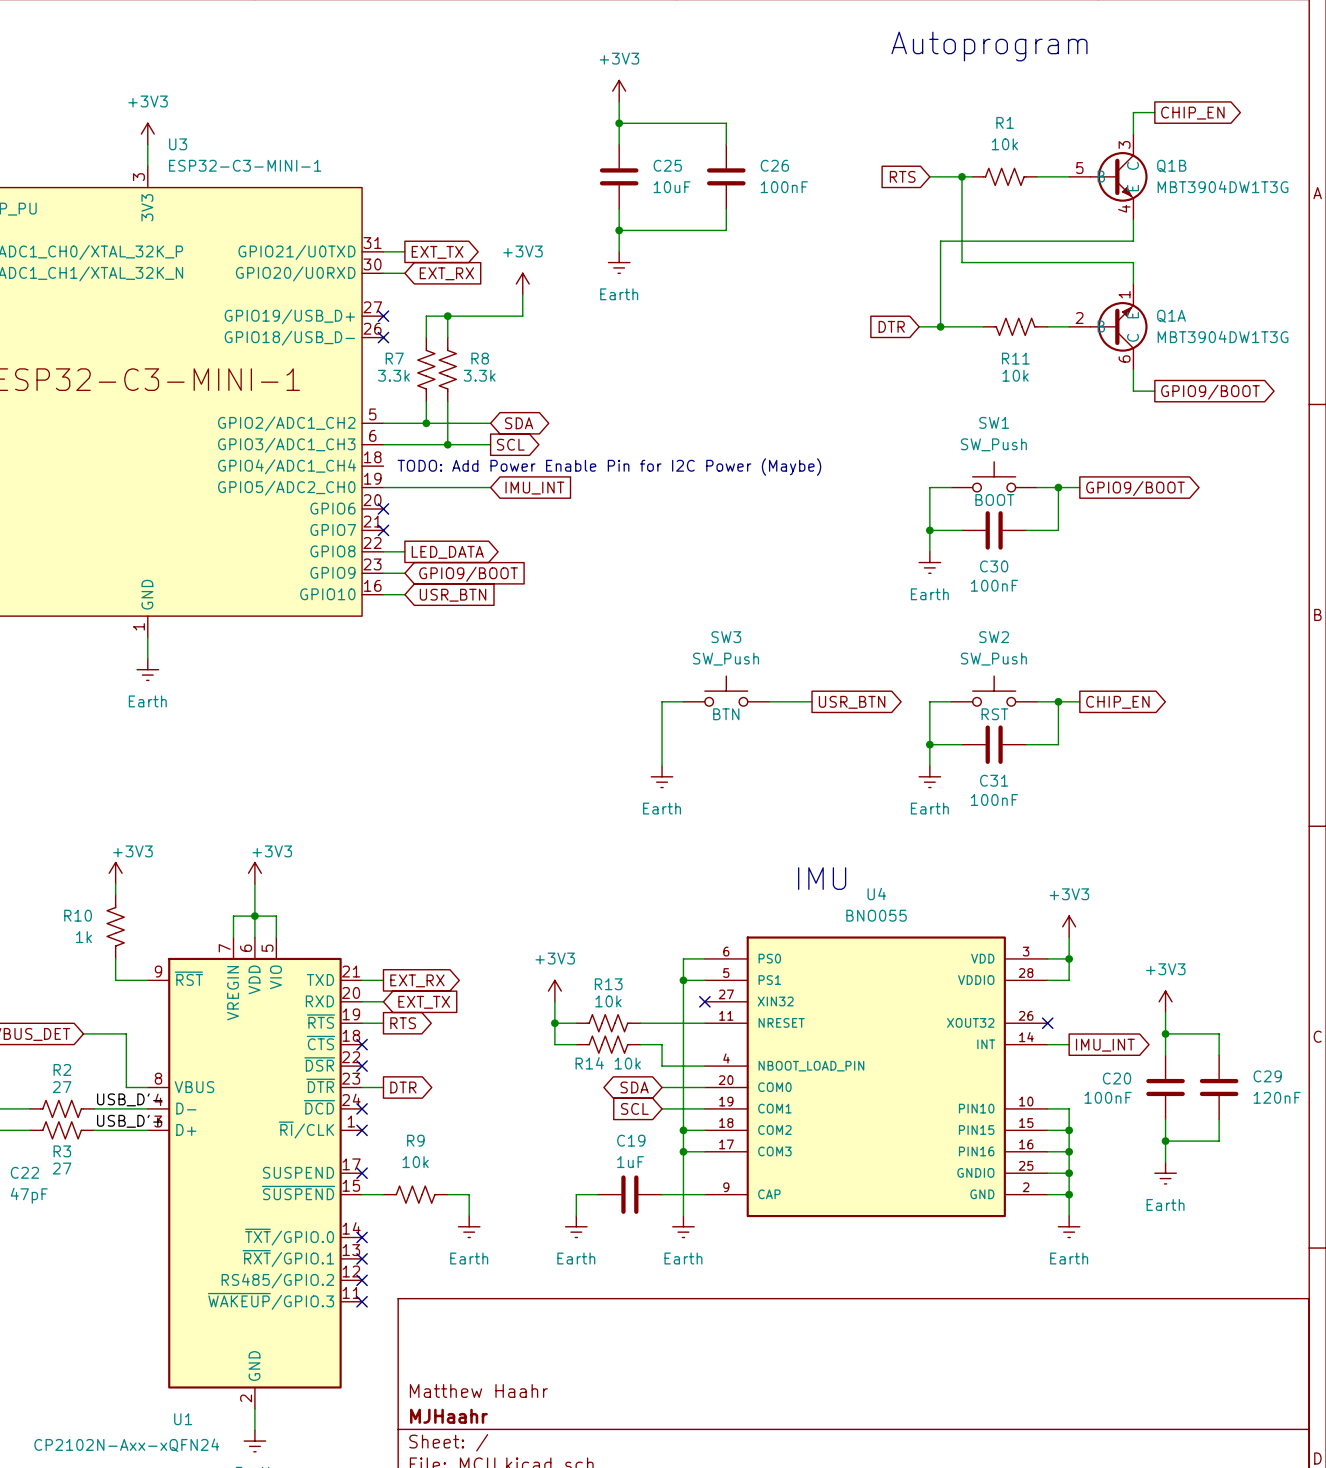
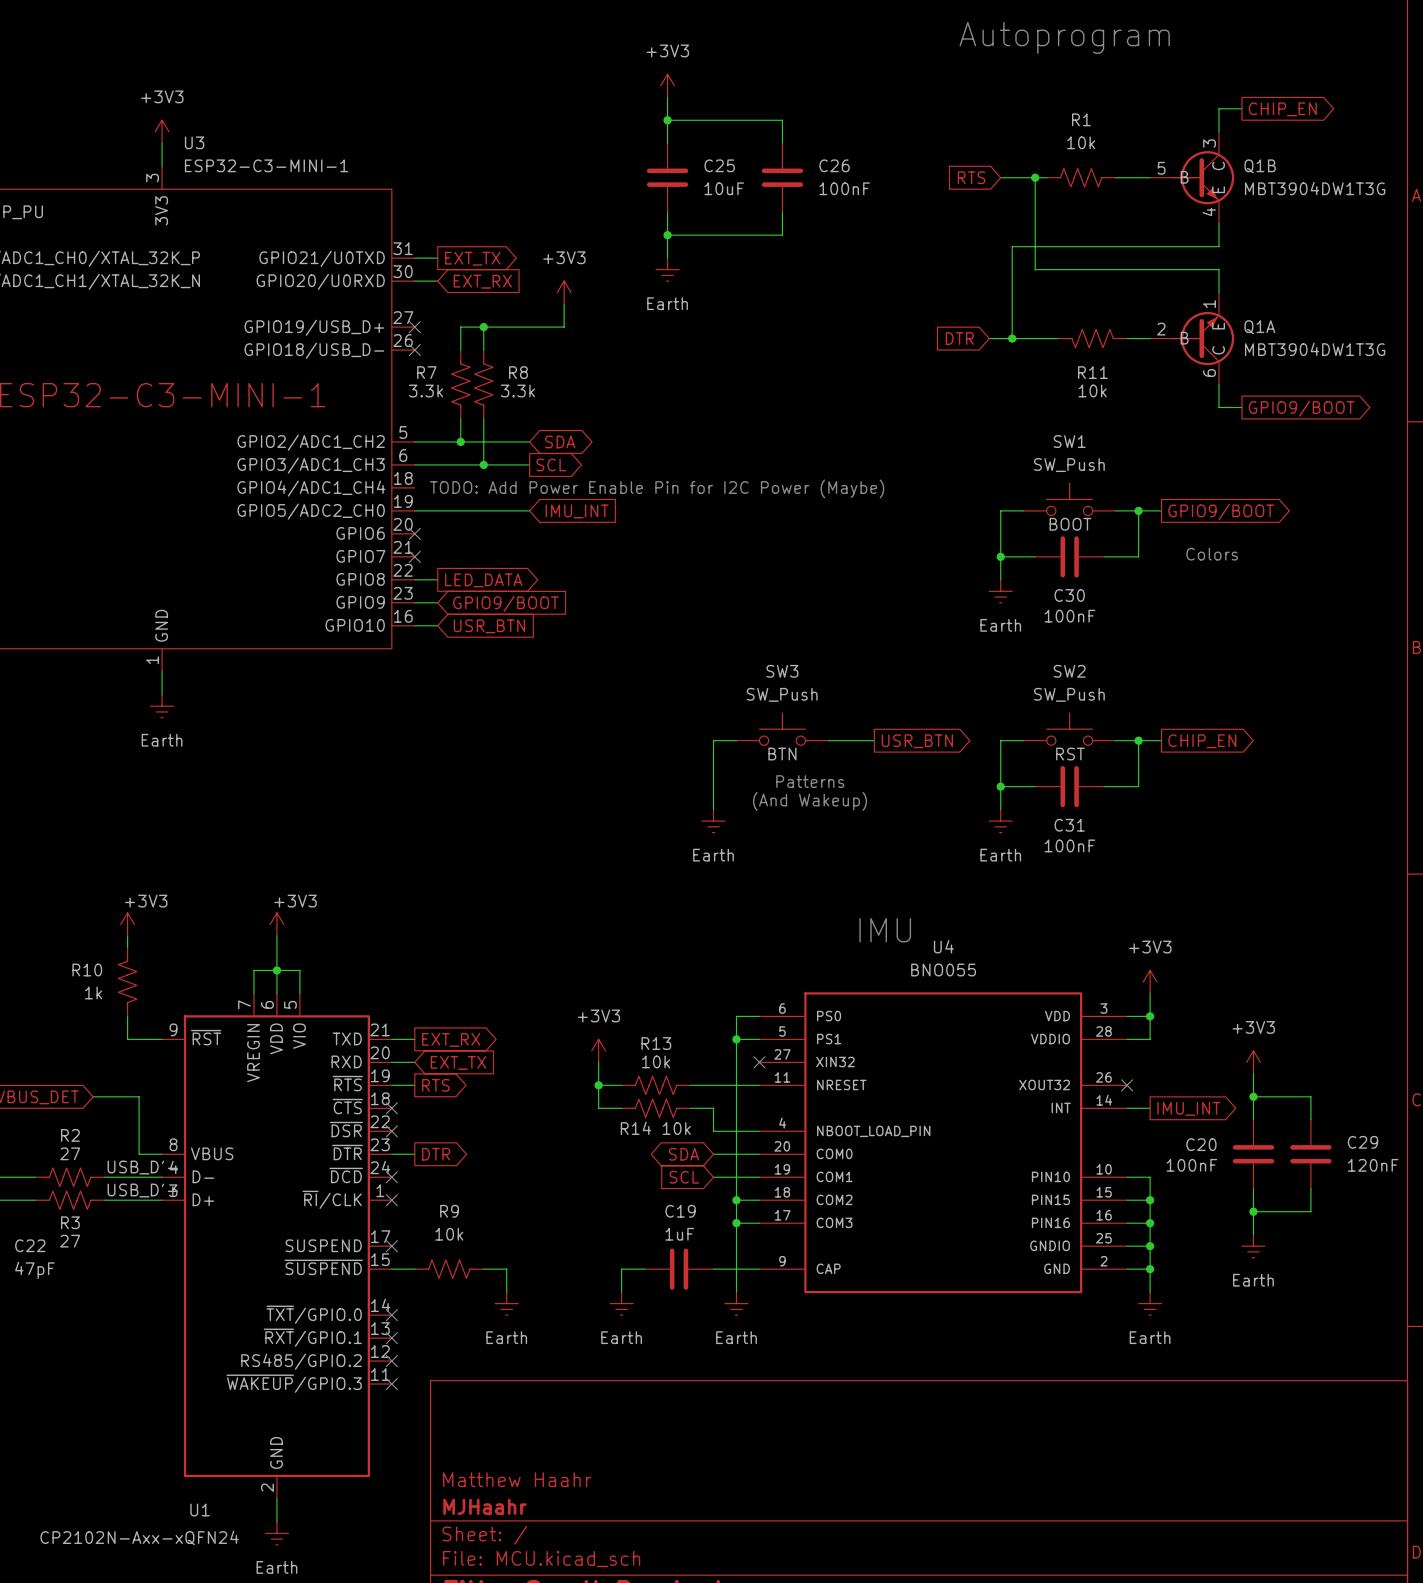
text: none -> Colors (1212, 554)
text: none -> Patterns (810, 781)
text: none -> (And Wakeup) (810, 801)

